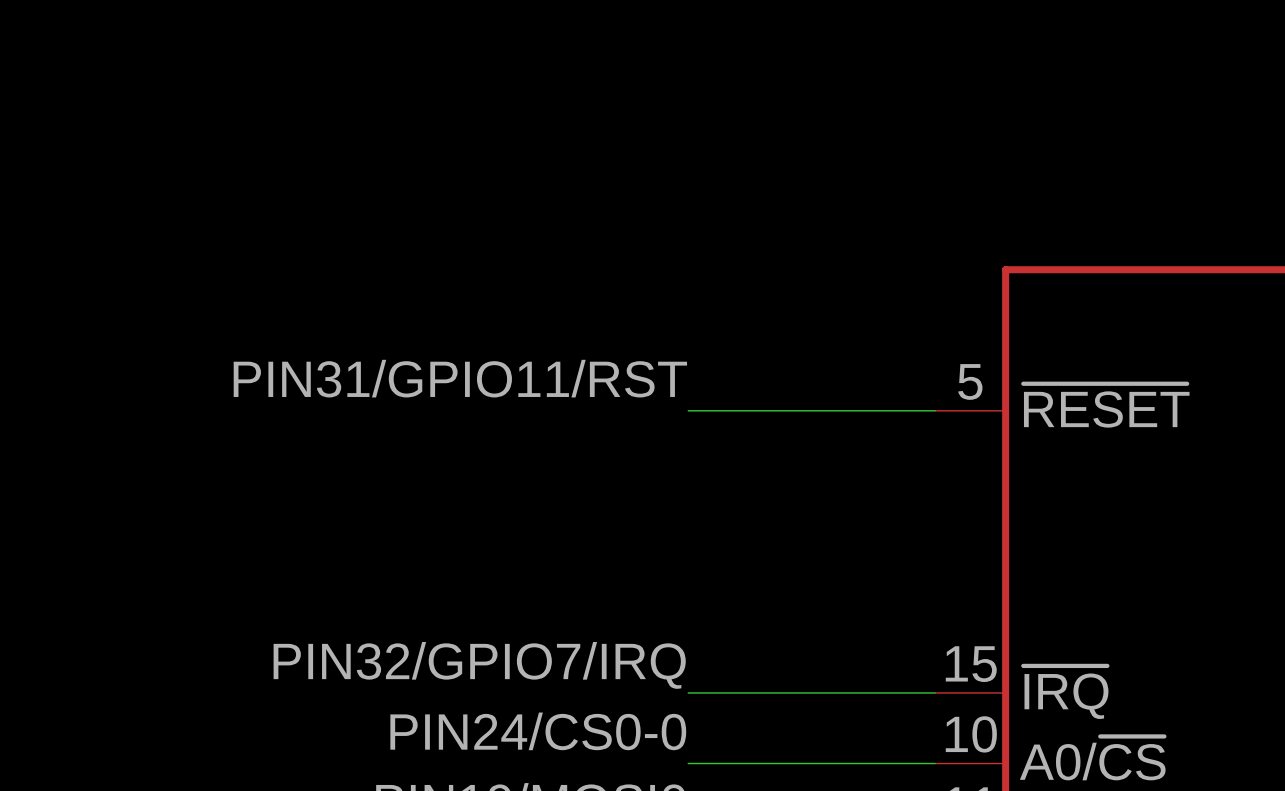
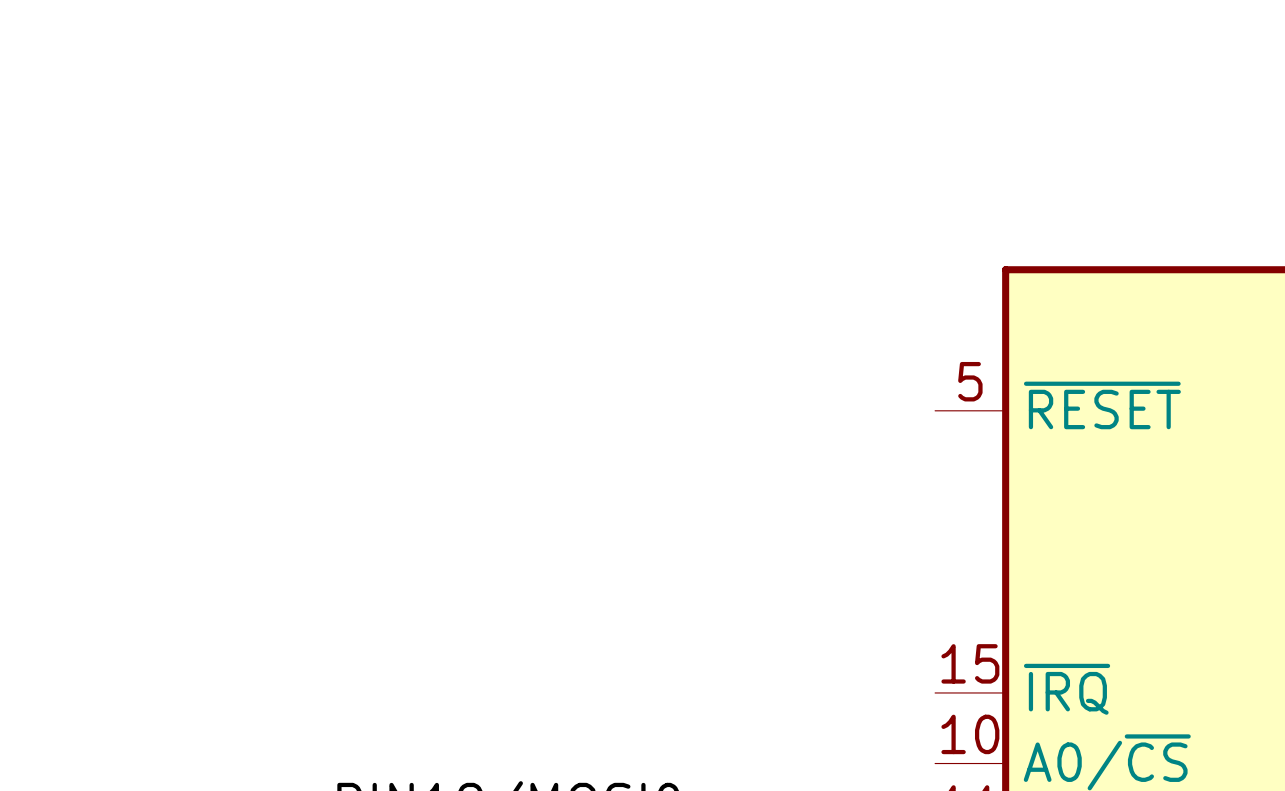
label: PIN31/GPIO11/RST (460, 378) -> none
wire: (688, 410) (935, 410) -> none
label: PIN32/GPIO7/IRQ (479, 665) -> none
wire: (688, 692) (935, 692) -> none
label: PIN24/CS0-0 (538, 731) -> none
wire: (688, 763) (935, 763) -> none

